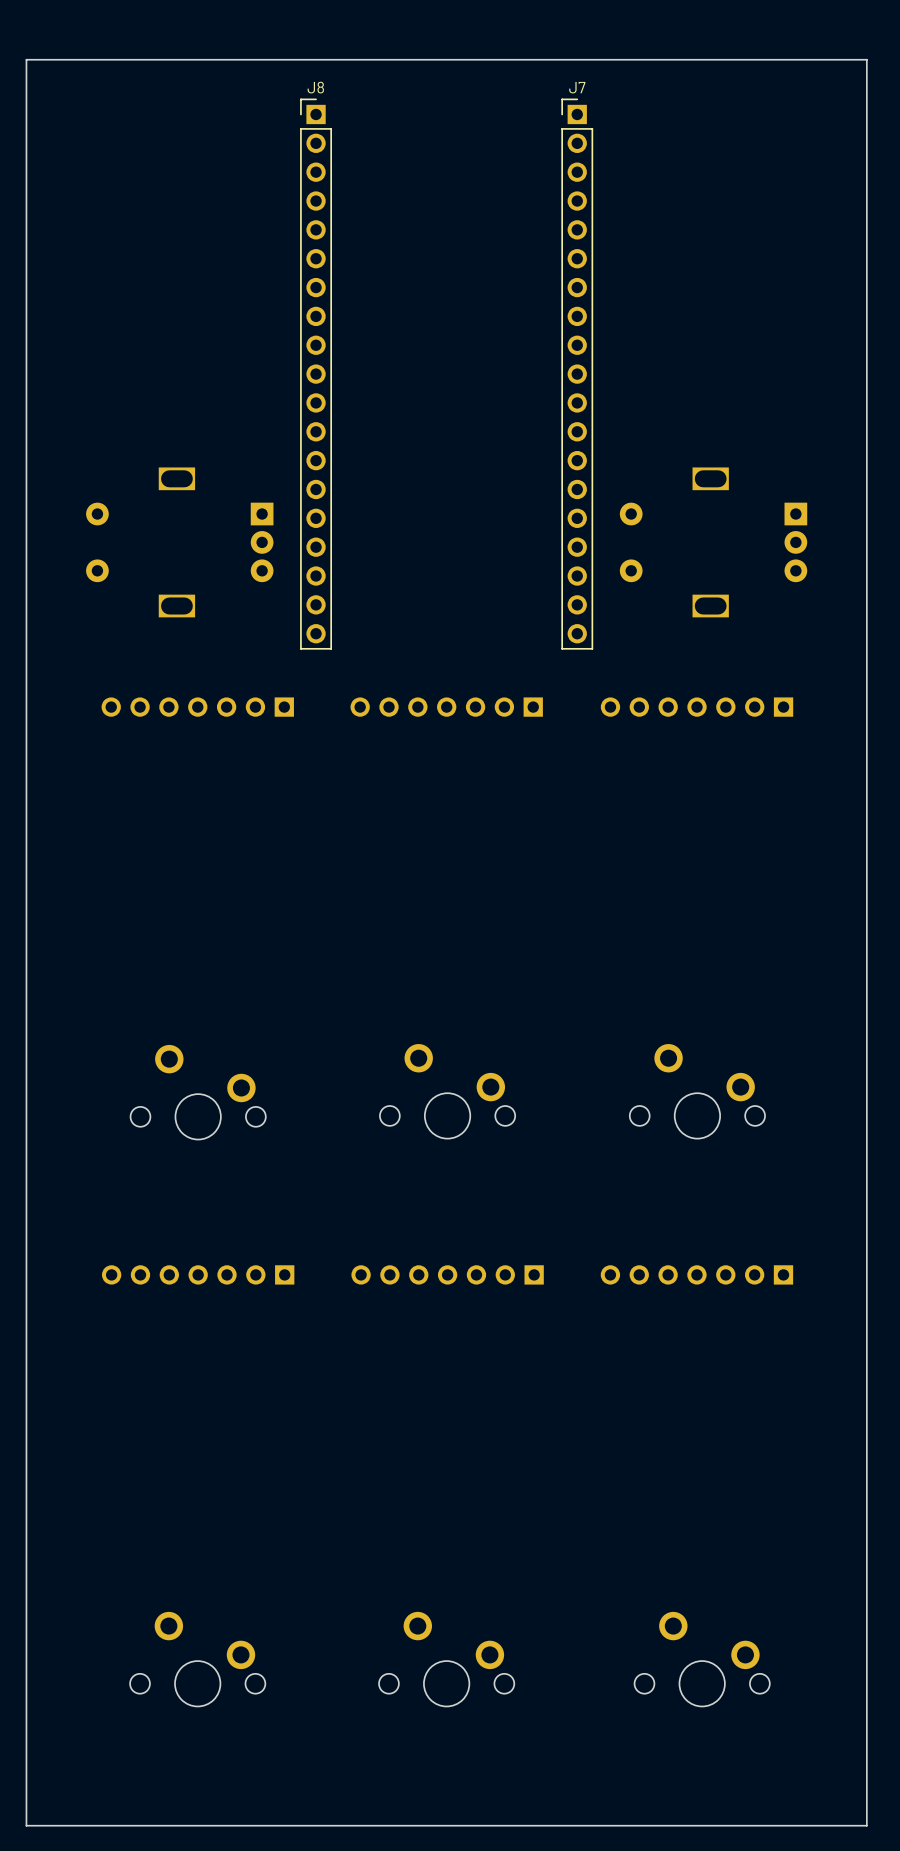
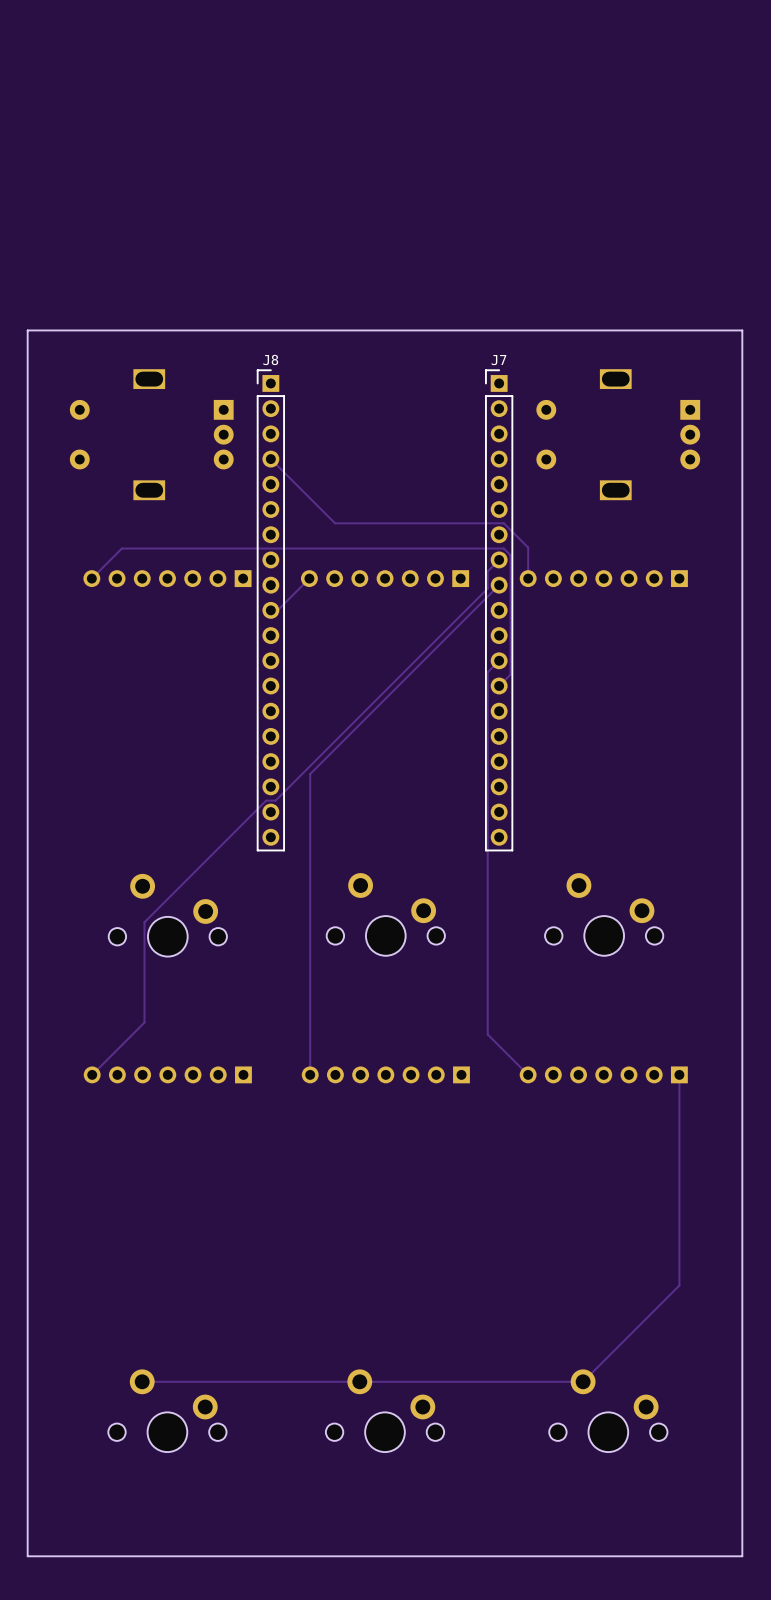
J8 position: (316, 374) -> (270, 610)
J7 position: (577, 374) -> (499, 610)
track: none -> (270, 459) (335, 523) (503, 523) (528, 547) (528, 578)
track: none -> (499, 559) (487, 571) (487, 588) (275, 800) (266, 800) (144, 922) (144, 1022) (92, 1074)
track: none -> (91, 578) (121, 548) (503, 548) (510, 555) (510, 674) (499, 685)
track: none -> (309, 578) (277, 610) (270, 610)
track: none -> (499, 585) (310, 774) (310, 1074)
track: none -> (499, 660) (487, 672) (487, 1034) (528, 1074)
track: none -> (679, 1074) (679, 1285) (583, 1381) (142, 1381)
board edge: (855, 1825) (866, 1825) (866, 59) (26, 59) (26, 1825) (37, 1825) -> (742, 1556) (742, 330) (27, 330) (27, 1556)

